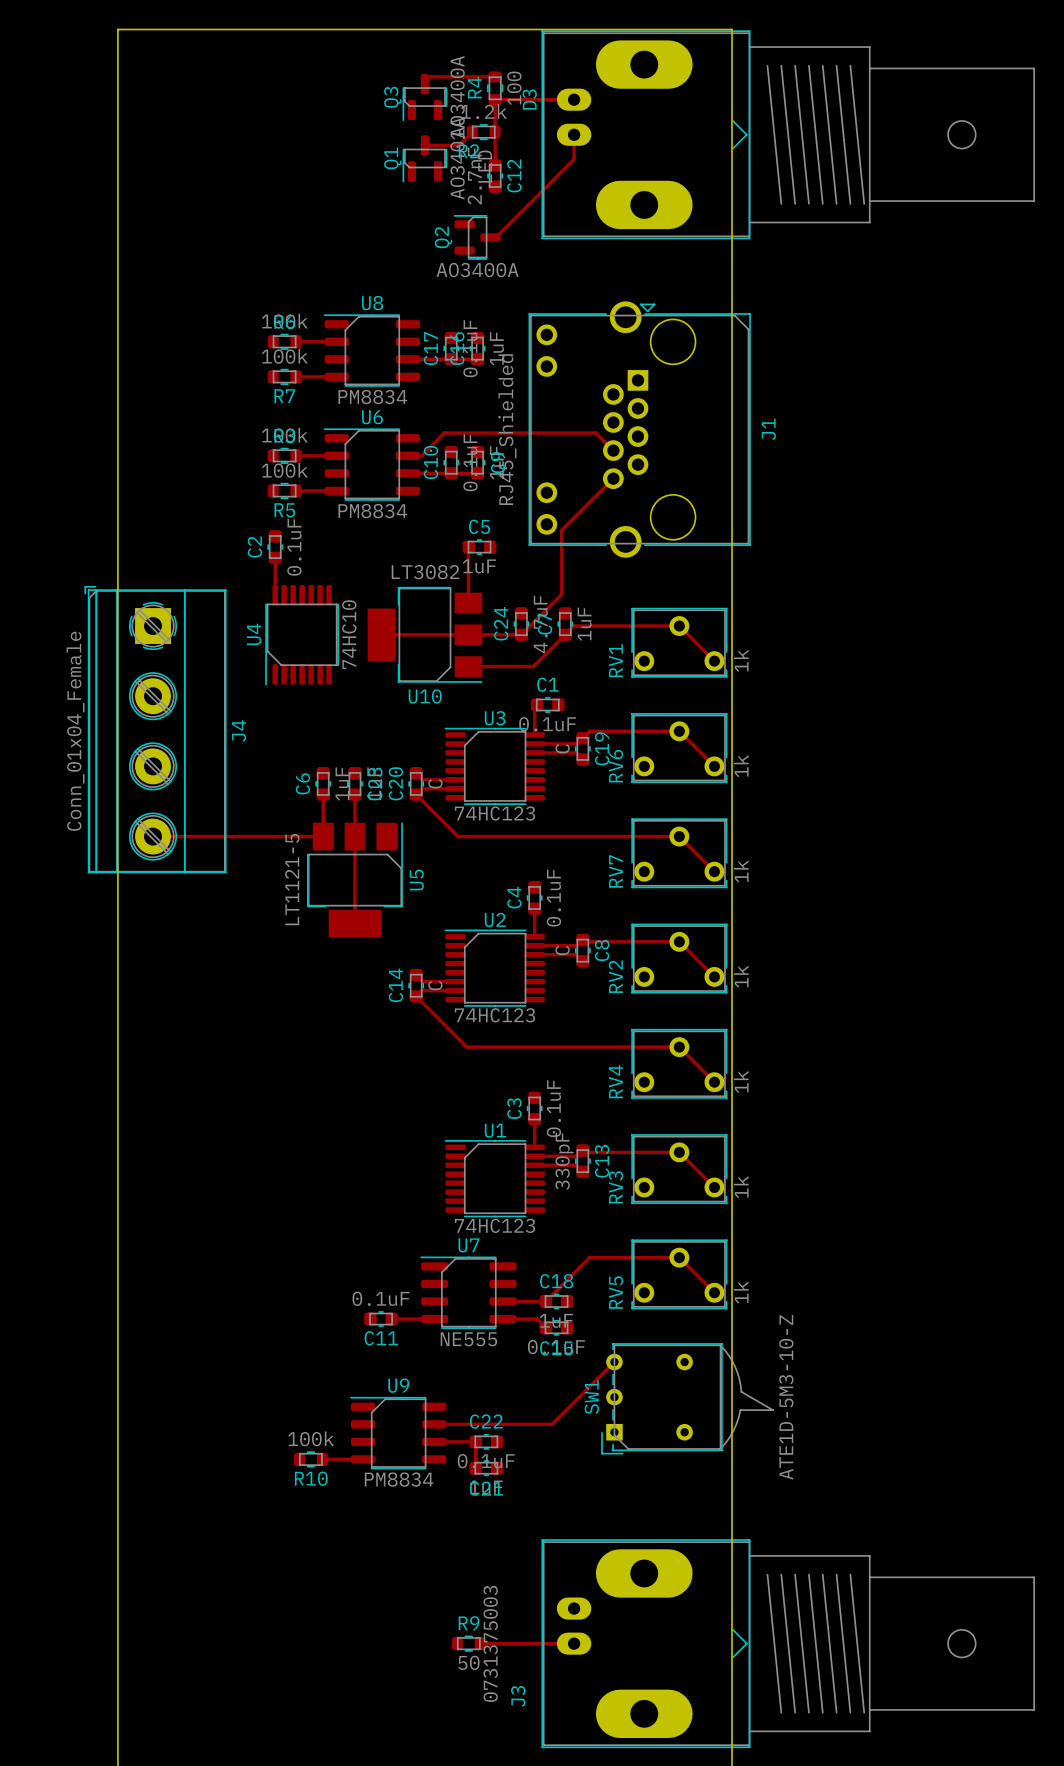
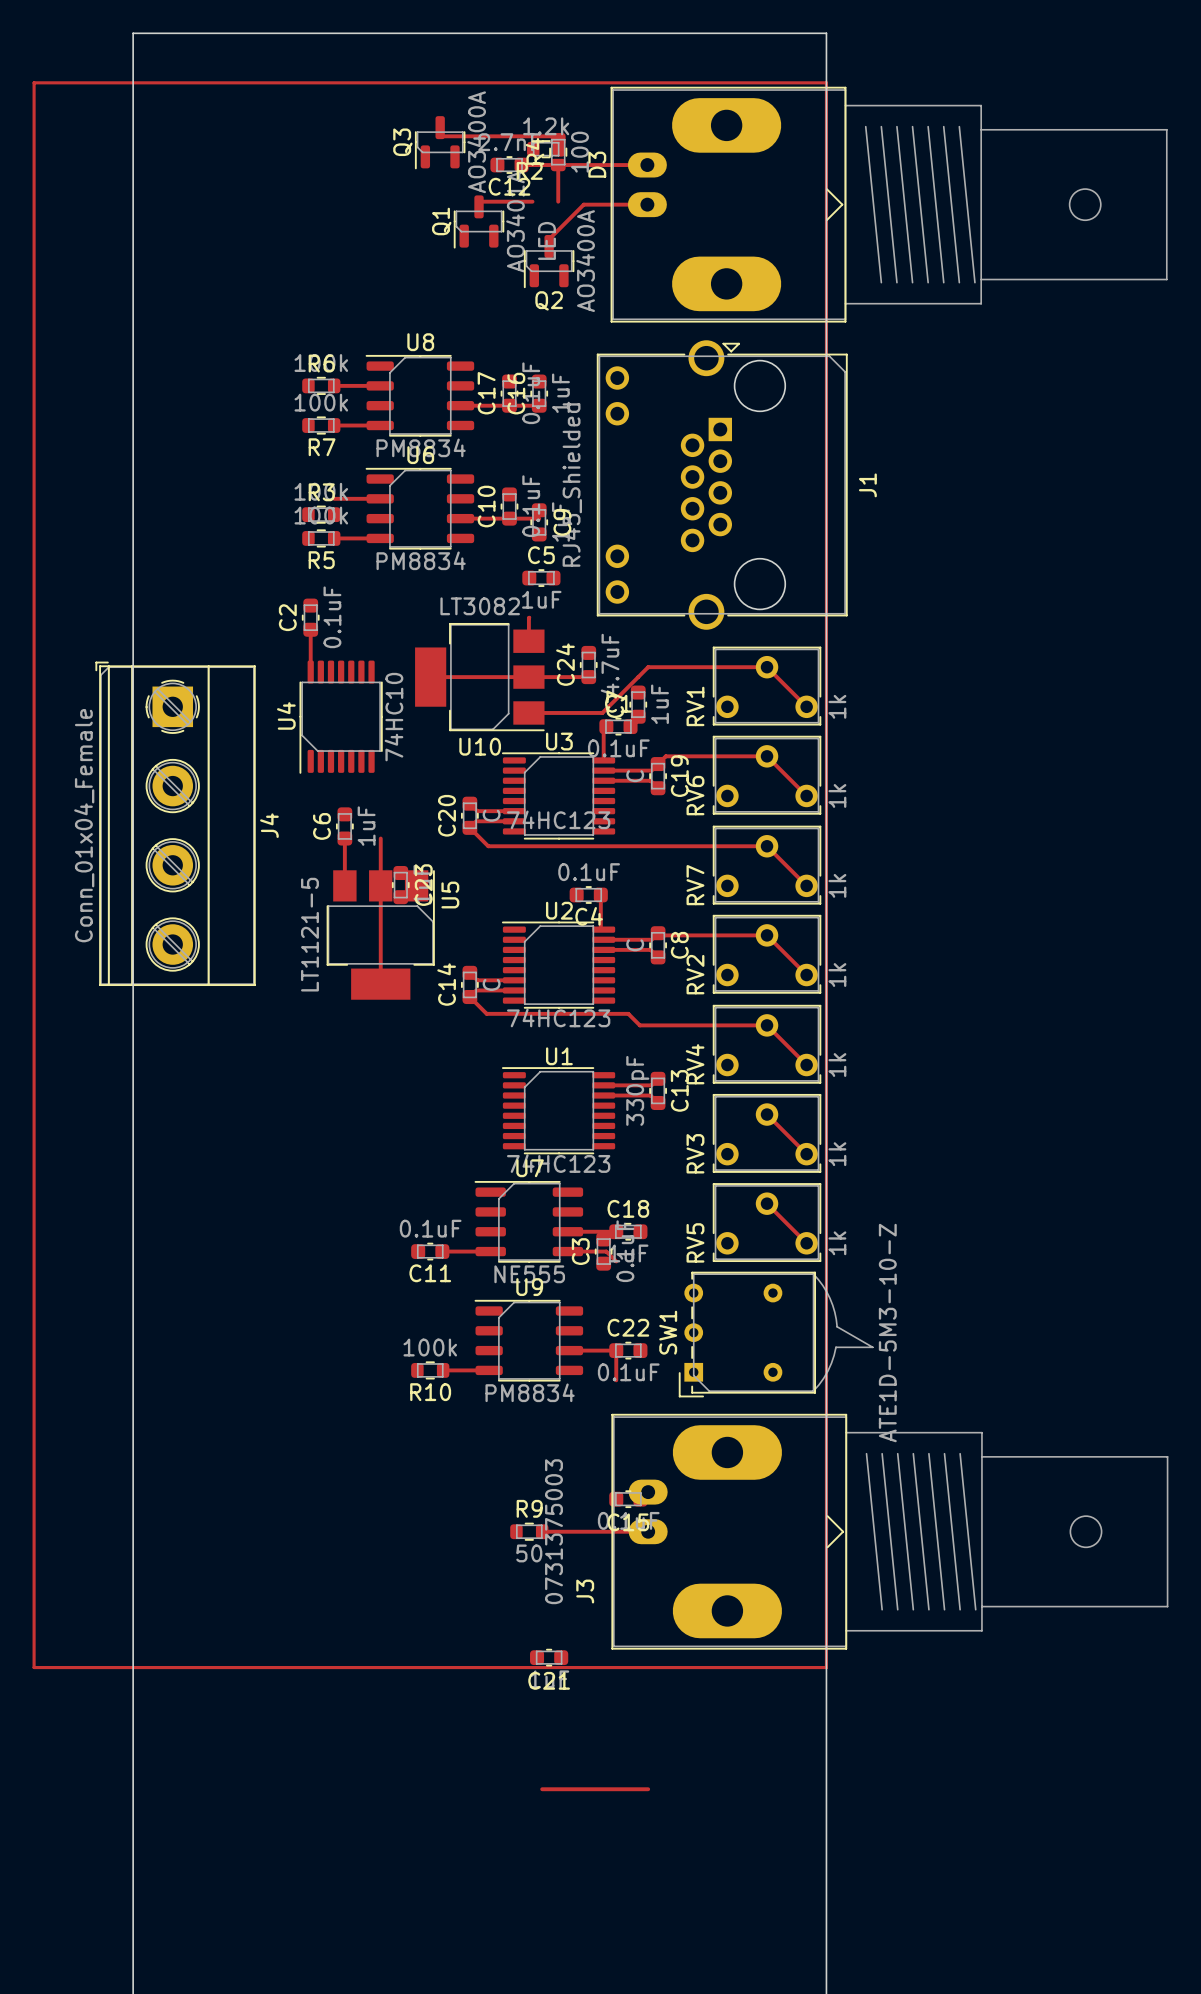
track: none -> (34, 82) (826, 82) (826, 1667) (34, 1667) (34, 82)
track: (495, 76) (427, 76) (424, 79) (424, 84) -> none
R4 position: (495, 88) -> (558, 152)
Q3 position: (424, 97) -> (440, 142)
track: (574, 99) (495, 99) (495, 165) -> none
track: none -> (440, 127) (438, 136) (555, 136) (558, 139) (556, 139)
track: (472, 132) (458, 145) (424, 145) -> none
track: (565, 134) (574, 134) (574, 159) (496, 237) (490, 237) -> none
D3 position: (788, 134) -> (889, 204)
track: none -> (521, 165) (647, 165)
track: none -> (558, 165) (558, 201)
Q1 position: (424, 158) -> (479, 221)
C12 rotation: 0° (495, 176) -> 90° clockwise (509, 165)
C12 position: (495, 176) -> (509, 165)
track: none -> (532, 201) (479, 201) (479, 206)
track: none -> (647, 204) (583, 204) (549, 239) (549, 246)
Q2 rotation: 0° (477, 237) -> 90° counterclockwise (549, 261)
track: (613, 450) (595, 433) (444, 433) (421, 455) (407, 455) -> none
track: (295, 455) (336, 455) -> (334, 498) (380, 498)
C10 position: (451, 462) -> (509, 506)
U6 position: (371, 464) -> (419, 508)
track: (407, 473) (477, 473) -> (460, 518) (539, 518)
track: (613, 478) (561, 530) (561, 594) (521, 634) (381, 634) -> none
R5 position: (284, 490) -> (321, 538)
track: (295, 490) (336, 490) -> (334, 538) (380, 538)
C5 position: (479, 547) -> (541, 578)
track: (468, 567) (468, 603) -> none
track: none -> (430, 677) (588, 677)
C24 position: (521, 624) -> (588, 665)
U10 position: (425, 634) -> (479, 677)
RV1 position: (679, 642) -> (767, 686)
track: (714, 661) (679, 626) (574, 626) (533, 666) (468, 666) -> (806, 706) (767, 667) (648, 667) (602, 712) (528, 712)
track: (537, 704) (534, 707) (534, 734) -> (606, 726) (603, 729) (603, 760)
C1 position: (547, 704) -> (618, 726)
track: none -> (514, 821) (476, 821) (469, 827) (488, 846) (767, 846) (806, 885)
track: none -> (344, 838) (344, 885)
track: (534, 743) (577, 743) (589, 731) (679, 731) (714, 766) -> (603, 770) (651, 770) (665, 756) (767, 756) (806, 795)
C19 position: (582, 748) -> (658, 776)
RV6 position: (679, 748) -> (767, 775)
track: (534, 752) (576, 752) (582, 759) -> (603, 780) (650, 780) (658, 788)
U3 position: (494, 766) -> (558, 795)
track: (416, 773) (422, 779) (455, 779) -> (469, 803) (477, 811) (514, 811)
C6 position: (323, 783) -> (344, 826)
C20 position: (416, 783) -> (469, 815)
track: (455, 788) (421, 788) (416, 794) (458, 836) (679, 836) (714, 871) -> none
track: none -> (600, 895) (600, 928) (603, 929)
track: (323, 794) (323, 836) (153, 836) -> none
track: (354, 794) (354, 923) -> (380, 838) (380, 984)
U3 value position: 74HC123 (494, 813) -> 74HC123 (558, 819)
RV7 position: (679, 853) -> (767, 865)
track: none -> (514, 990) (476, 990) (469, 997) (486, 1013) (628, 1013) (639, 1025) (767, 1025) (806, 1065)
U5 name position: U5 (416, 879) -> U5 (450, 895)
U5 position: (354, 880) -> (380, 934)
C4 name position: C4 (514, 897) -> C4 (589, 916)
C4 rotation: 0° (534, 897) -> 90° clockwise (588, 895)
C4 position: (534, 897) -> (588, 895)
C4 value position: 0.1uF (553, 898) -> 0.1uF (589, 872)
track: (534, 908) (534, 936) -> none
track: (534, 945) (577, 945) (582, 939) (584, 941) (679, 941) (714, 976) -> (603, 939) (651, 939) (658, 933) (660, 935) (767, 935) (806, 975)
C8 position: (582, 950) -> (658, 945)
track: (534, 954) (576, 954) (582, 961) -> (603, 949) (650, 949) (658, 957)
track: none -> (660, 1081) (658, 1078) (651, 1085) (603, 1085)
RV2 position: (679, 958) -> (767, 954)
U2 position: (494, 968) -> (558, 965)
track: (416, 975) (422, 981) (455, 981) -> (469, 972) (477, 980) (514, 980)
C14 position: (416, 985) -> (469, 984)
track: none -> (767, 1114) (806, 1154)
track: (455, 990) (421, 990) (416, 996) (466, 1047) (679, 1047) (714, 1082) -> none
RV4 position: (679, 1063) -> (767, 1044)
track: none -> (767, 1203) (806, 1243)
track: none -> (567, 1231) (616, 1231)
track: (534, 1119) (534, 1147) -> none
track: (534, 1156) (577, 1156) (582, 1150) (584, 1152) (679, 1152) (714, 1187) -> none
C13 position: (582, 1161) -> (658, 1090)
track: (534, 1165) (576, 1165) (582, 1171) -> (603, 1095) (650, 1095) (658, 1102)
RV3 position: (679, 1169) -> (767, 1133)
U1 position: (494, 1178) -> (558, 1110)
RV5 position: (679, 1274) -> (767, 1222)
U7 position: (468, 1292) -> (528, 1221)
track: (714, 1292) (679, 1257) (589, 1257) (545, 1301) (503, 1301) -> none
C18 position: (556, 1301) -> (628, 1231)
C11 position: (381, 1319) -> (430, 1251)
track: (391, 1319) (434, 1319) -> (442, 1251) (490, 1251)
track: (503, 1319) (537, 1319) (545, 1327) -> (567, 1251) (606, 1251) (616, 1261)
track: none -> (542, 1531) (648, 1531)
track: (614, 1362) (552, 1424) (434, 1424) -> none
SW1 position: (687, 1398) -> (776, 1334)
U9 position: (398, 1433) -> (528, 1340)
track: (434, 1441) (475, 1441) (475, 1468) -> (569, 1350) (616, 1350) (616, 1380)
C22 position: (486, 1441) -> (628, 1350)
R10 position: (310, 1459) -> (430, 1370)
track: (322, 1459) (363, 1459) -> (443, 1370) (489, 1370)
R9 position: (468, 1643) -> (529, 1531)
track: (480, 1643) (574, 1643) -> (542, 1789) (648, 1789)
J3 position: (788, 1643) -> (889, 1531)

